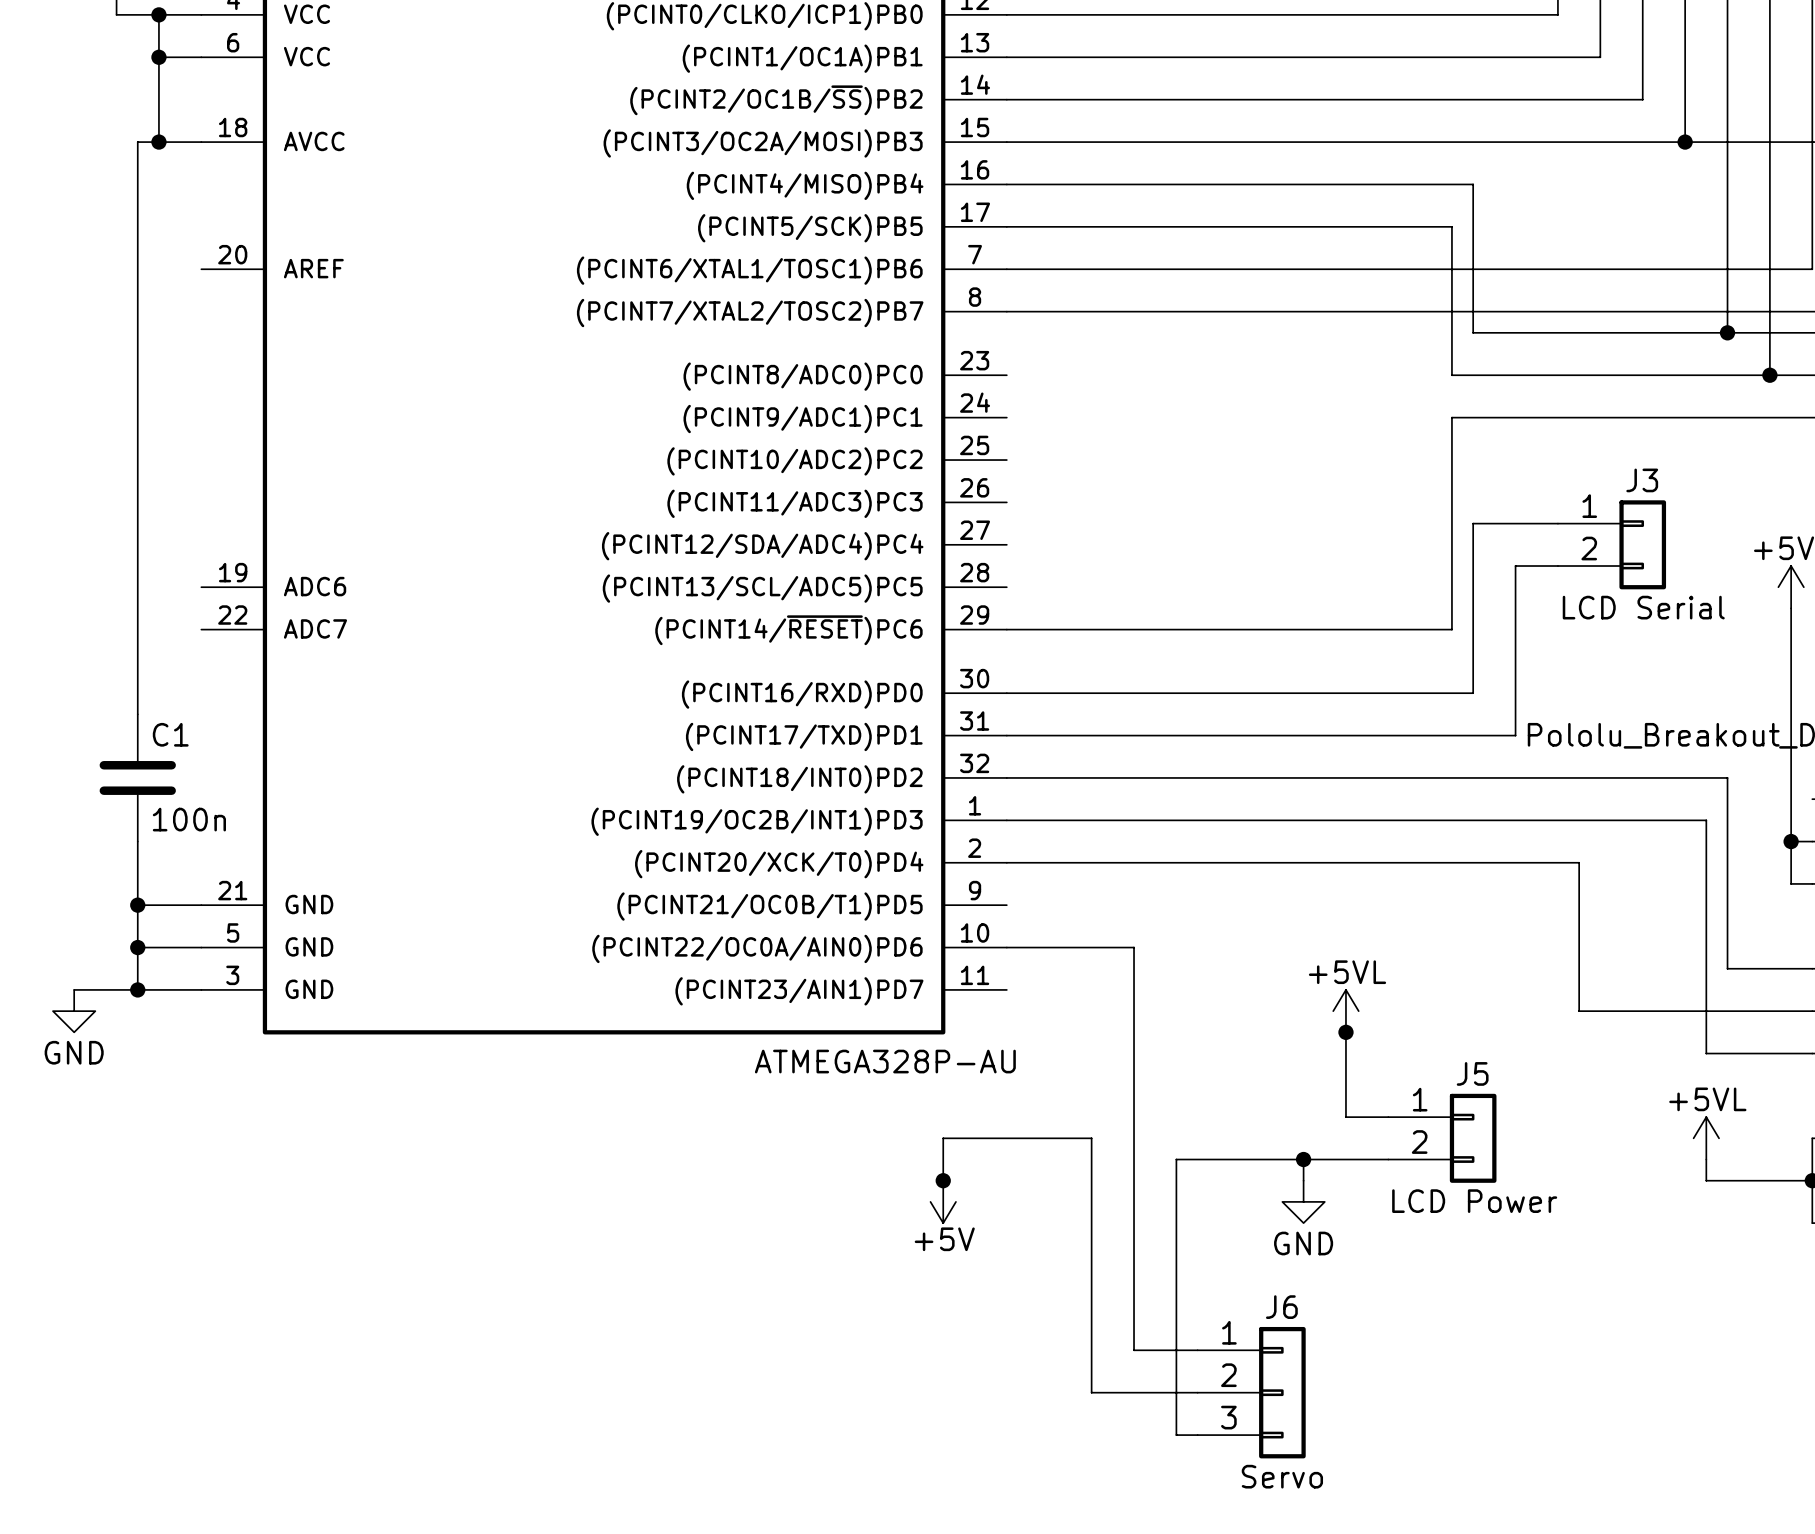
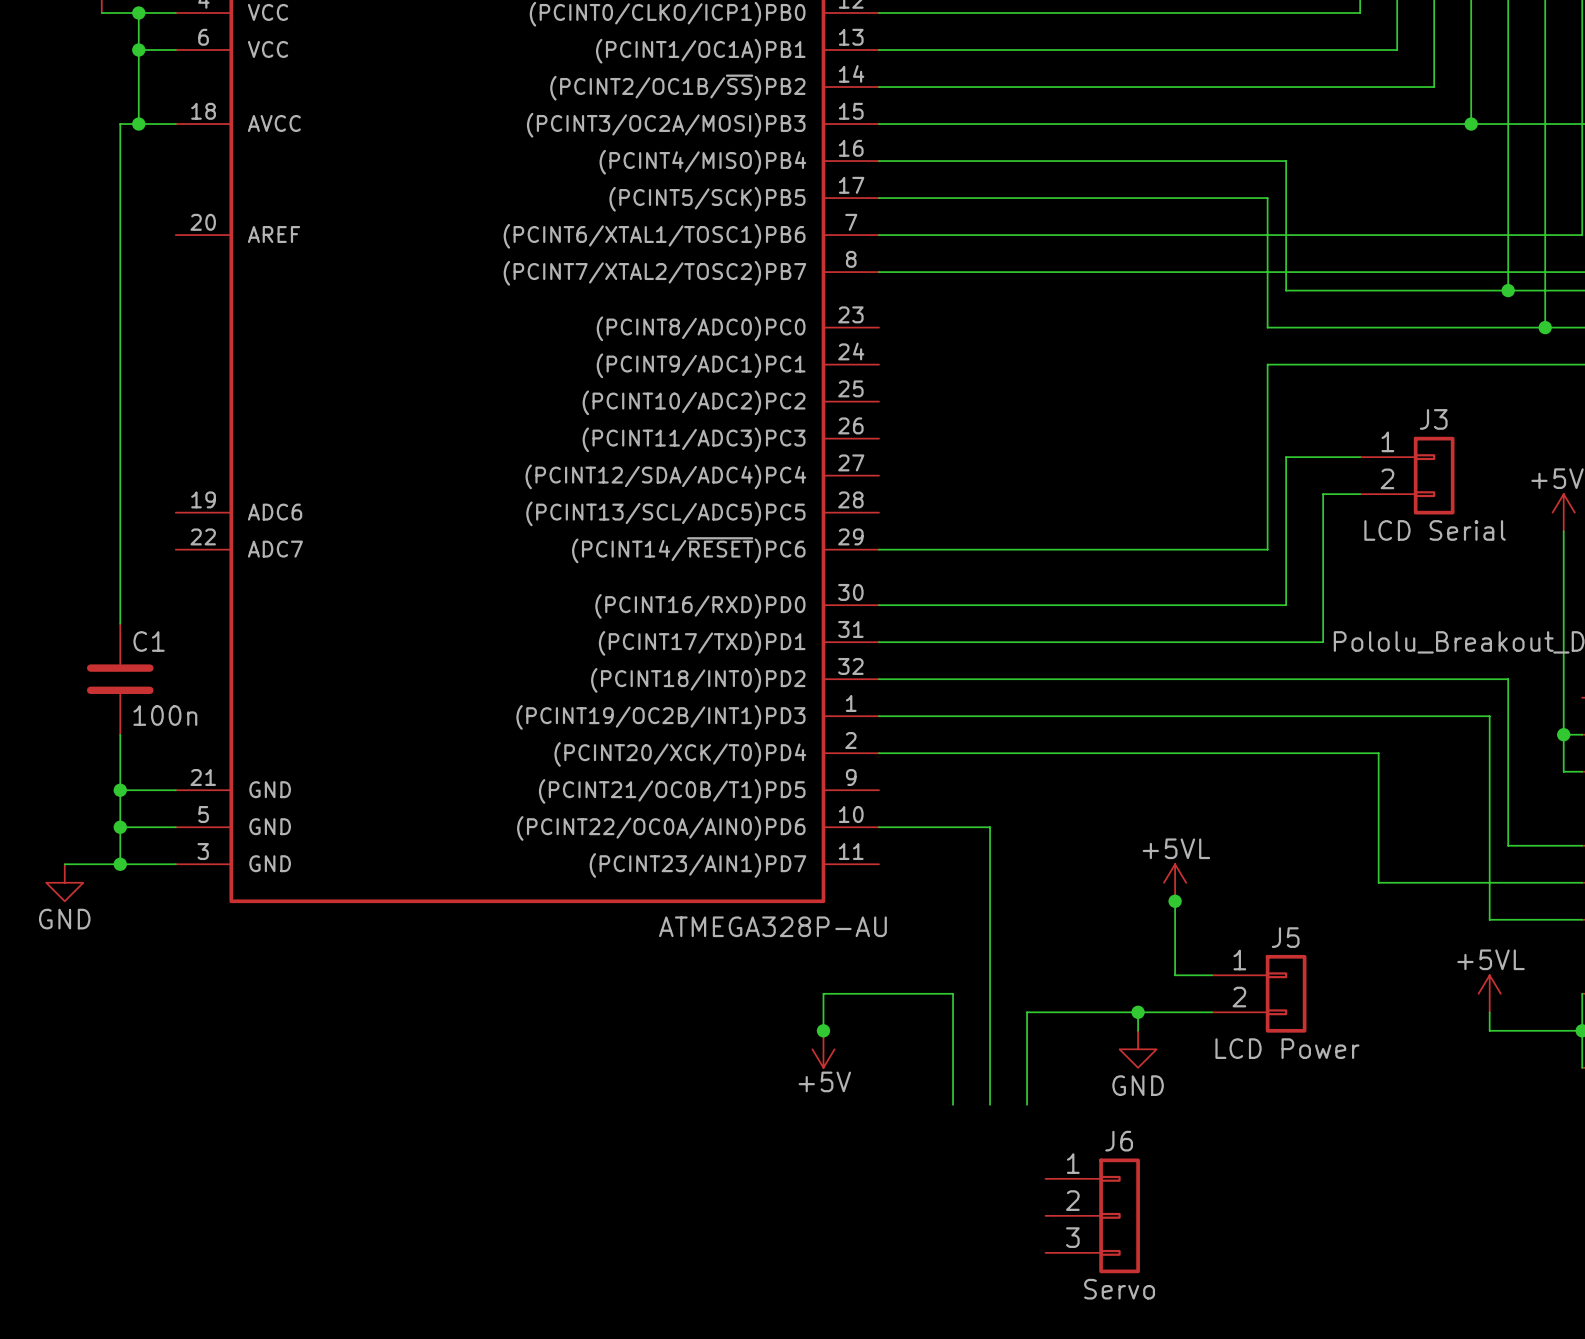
wire: (1091, 1265) (1091, 1392) (1197, 1392) -> none
wire: (1134, 1265) (1134, 1350) (1197, 1350) -> none
wire: (1176, 1265) (1176, 1435) (1197, 1435) -> none

